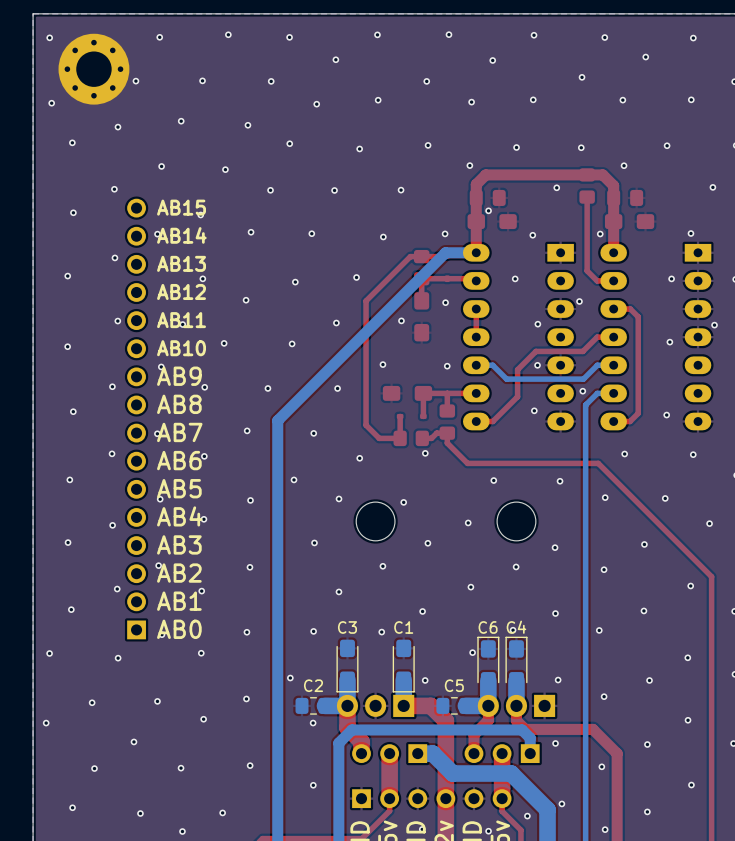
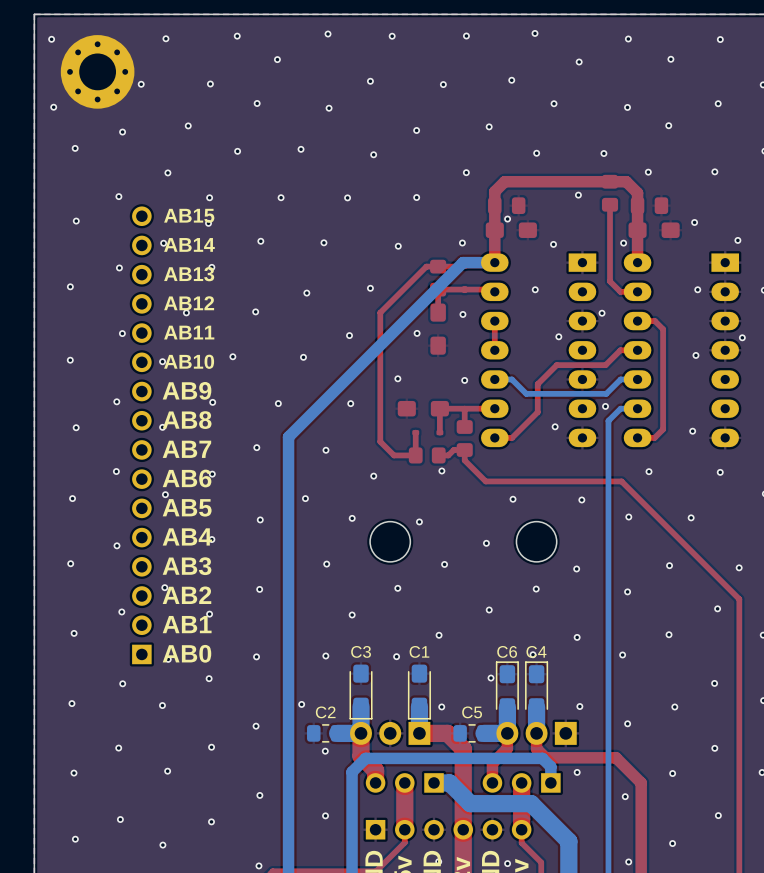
via: none -> (328, 34)
via: none -> (535, 33)
via: (534, 35) -> none
via: (289, 37) -> none
via: none -> (277, 59)
via: (335, 59) -> none
via: none -> (579, 62)
via: (492, 60) -> none
via: none -> (511, 80)
via: (582, 77) -> none
via: none -> (370, 81)
via: (271, 81) -> none
via: none -> (257, 103)
via: (378, 100) -> none
via: (622, 100) -> none
via: (471, 102) -> none
via: none -> (627, 107)
via: none -> (668, 125)
via: none -> (489, 126)
via: (247, 125) -> none
via: none -> (416, 130)
via: none -> (237, 151)
via: (428, 145) -> none
via: (667, 145) -> none
via: (469, 165) -> none
via: none -> (714, 171)
via: none -> (466, 172)
via: (225, 169) -> none
via: (712, 187) -> none
via: none -> (209, 197)
via: none -> (694, 222)
via: none -> (737, 240)
via: (690, 233) -> none
via: none -> (211, 267)
via: (202, 278) -> none
via: none -> (186, 312)
via: (182, 324) -> none
via: none -> (162, 361)
via: (537, 365) -> none
via: (161, 366) -> none
via: none -> (162, 427)
via: (157, 433) -> none
via: none -> (165, 494)
via: (160, 499) -> none
via position: (709, 523) -> (739, 567)
via: (49, 653) -> none
via: none -> (71, 703)
via: none -> (162, 705)
via: (157, 701) -> none
via: (92, 702) -> none
via: none -> (118, 748)
via: (46, 723) -> none
via: (133, 741) -> none
via: none -> (167, 771)
via: none -> (73, 773)
via: (94, 768) -> none
via: (181, 768) -> none
via: none -> (120, 819)
via: none -> (211, 821)
via: (561, 803) -> none
via: (222, 812) -> none
via: (140, 813) -> none
via: none -> (162, 845)
via: (527, 816) -> none
via: (182, 831) -> none
via: none -> (258, 865)

